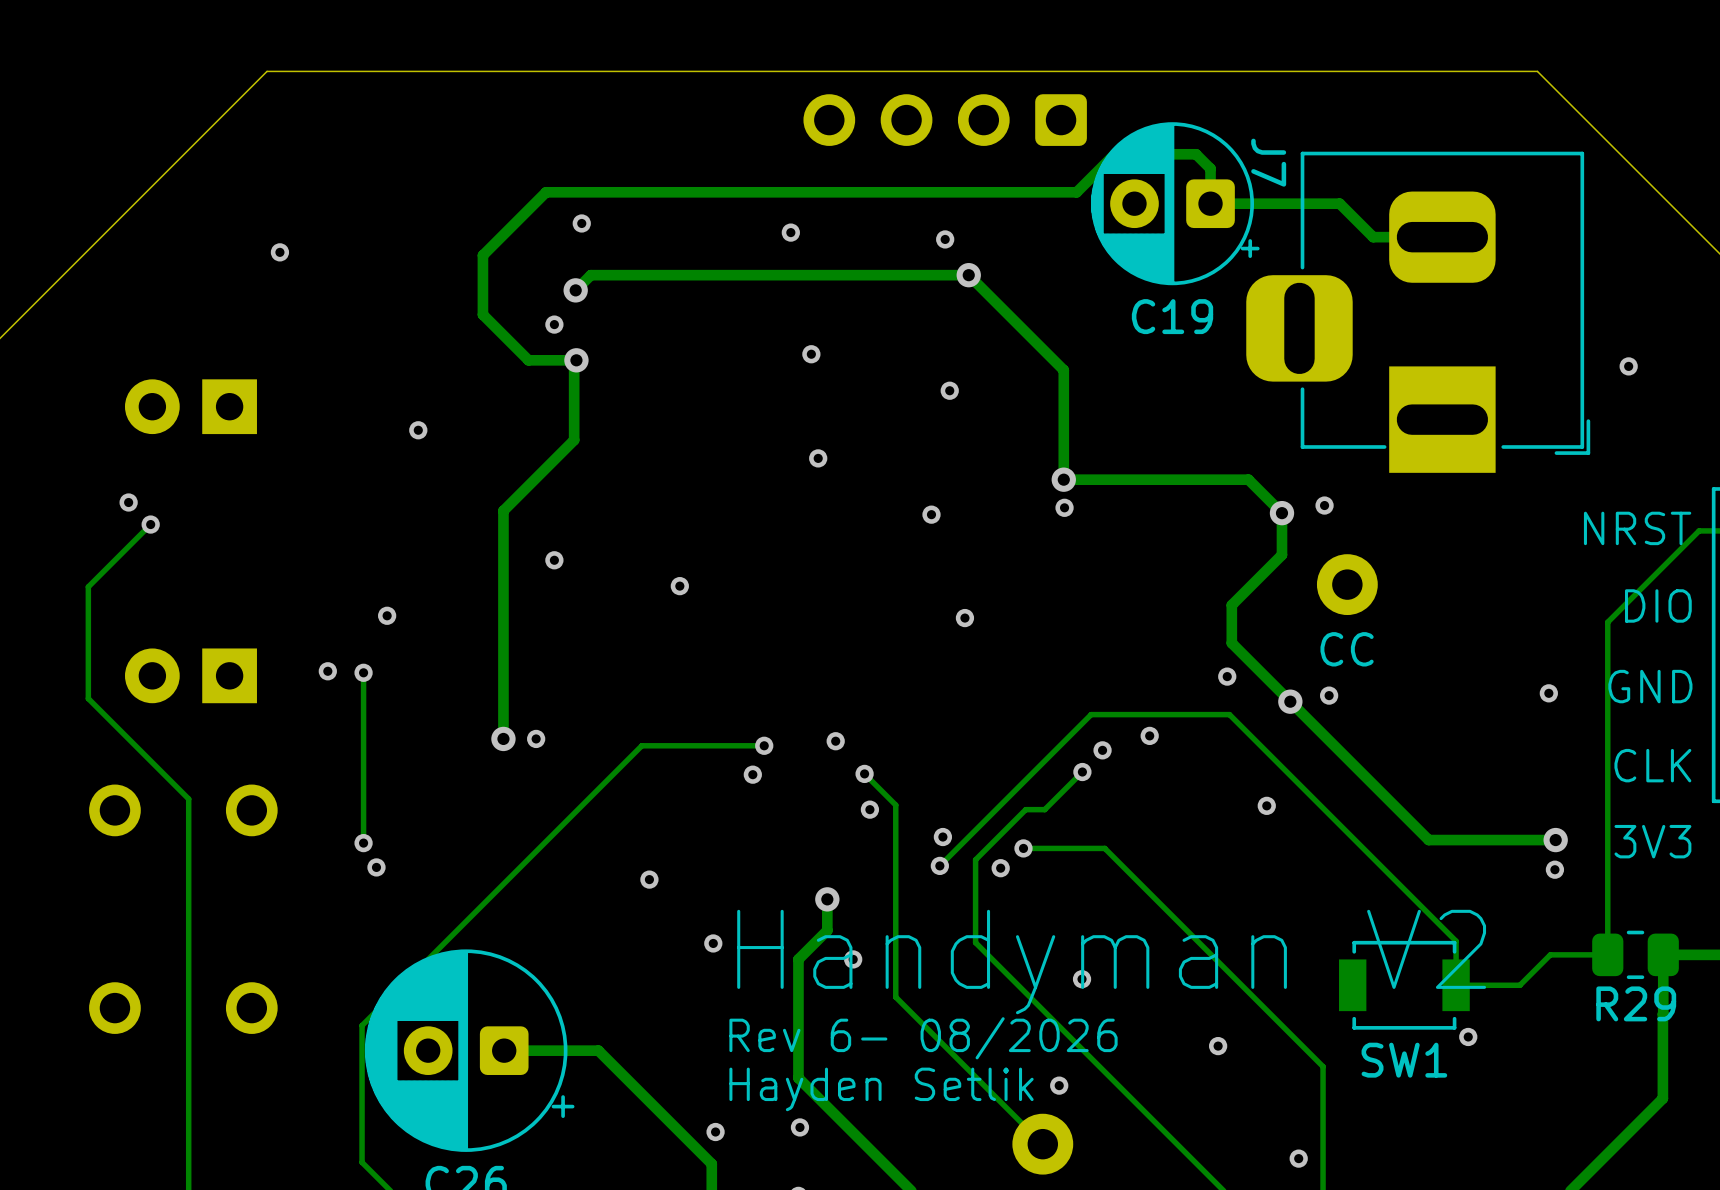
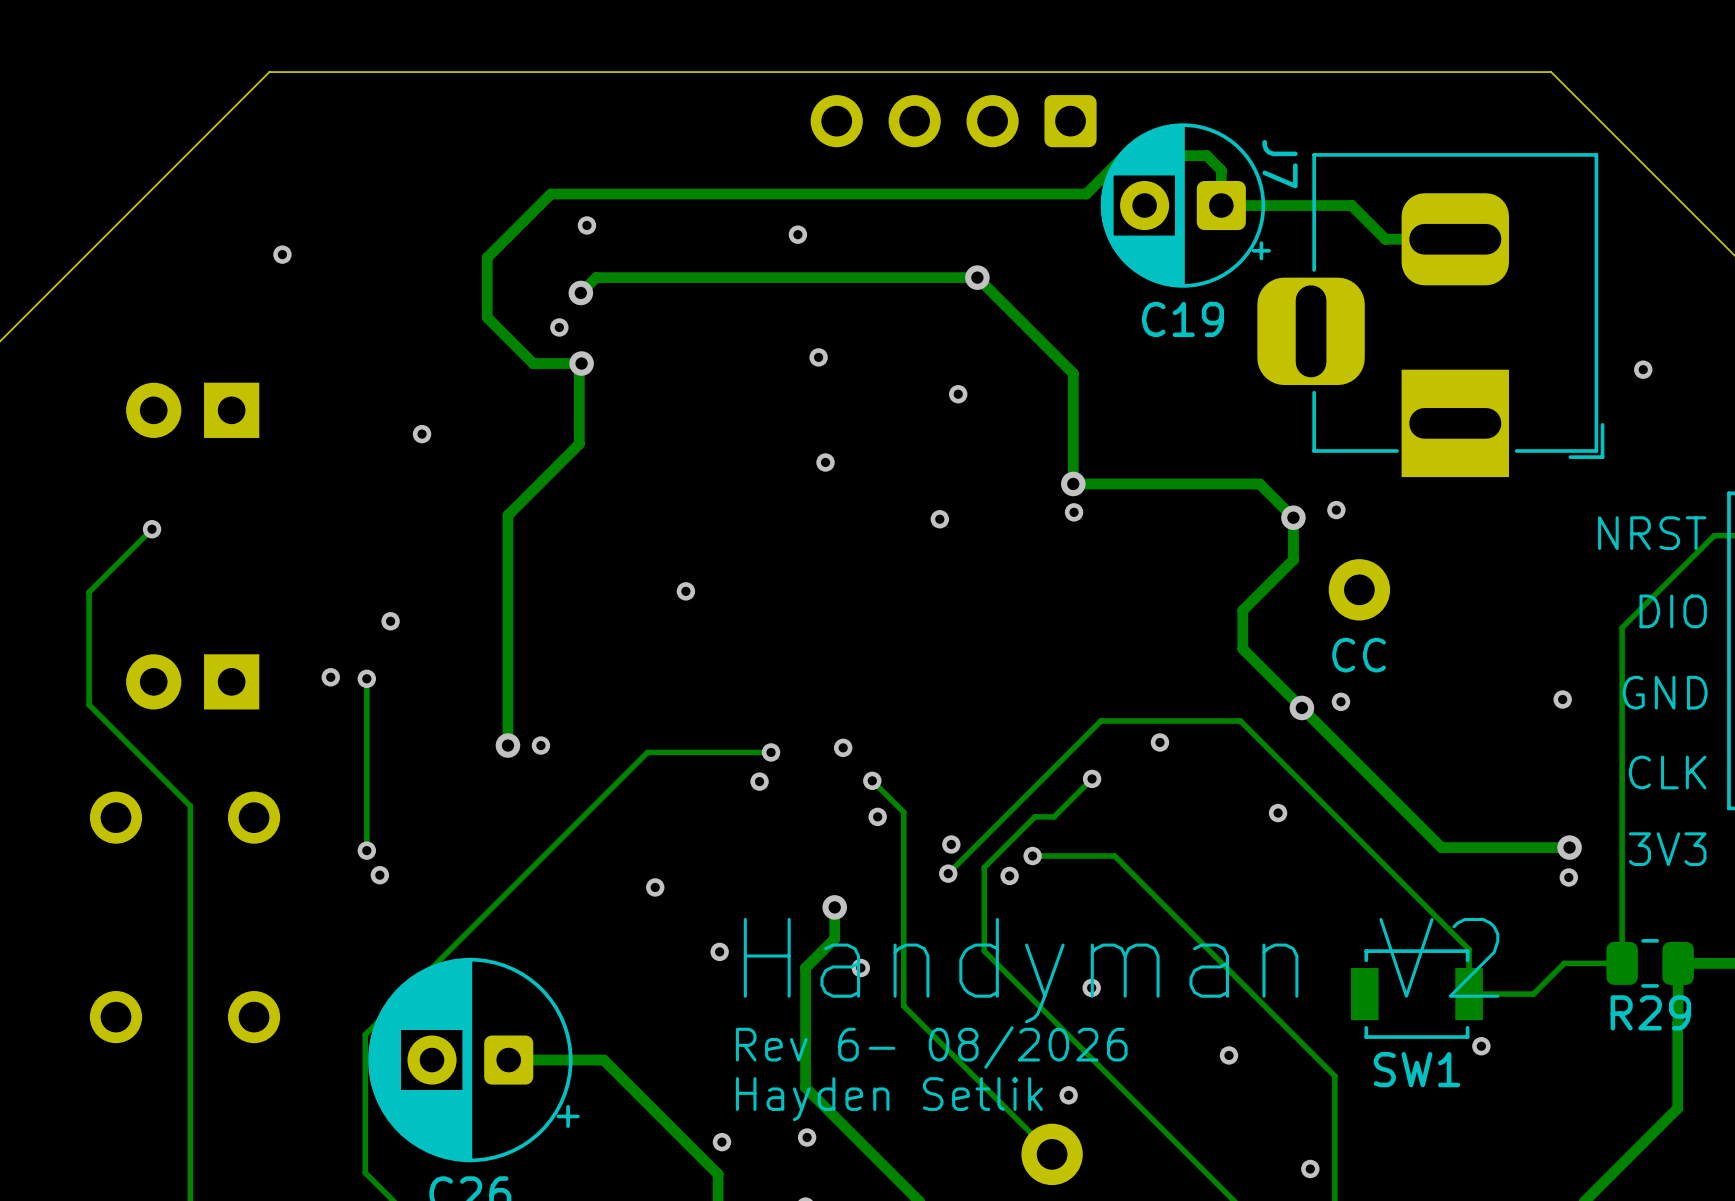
via: (945, 239) -> none
via: (128, 502) -> none
via: (554, 560) -> none
via: (964, 618) -> none
via: (1227, 676) -> none
via: (1102, 750) -> none

